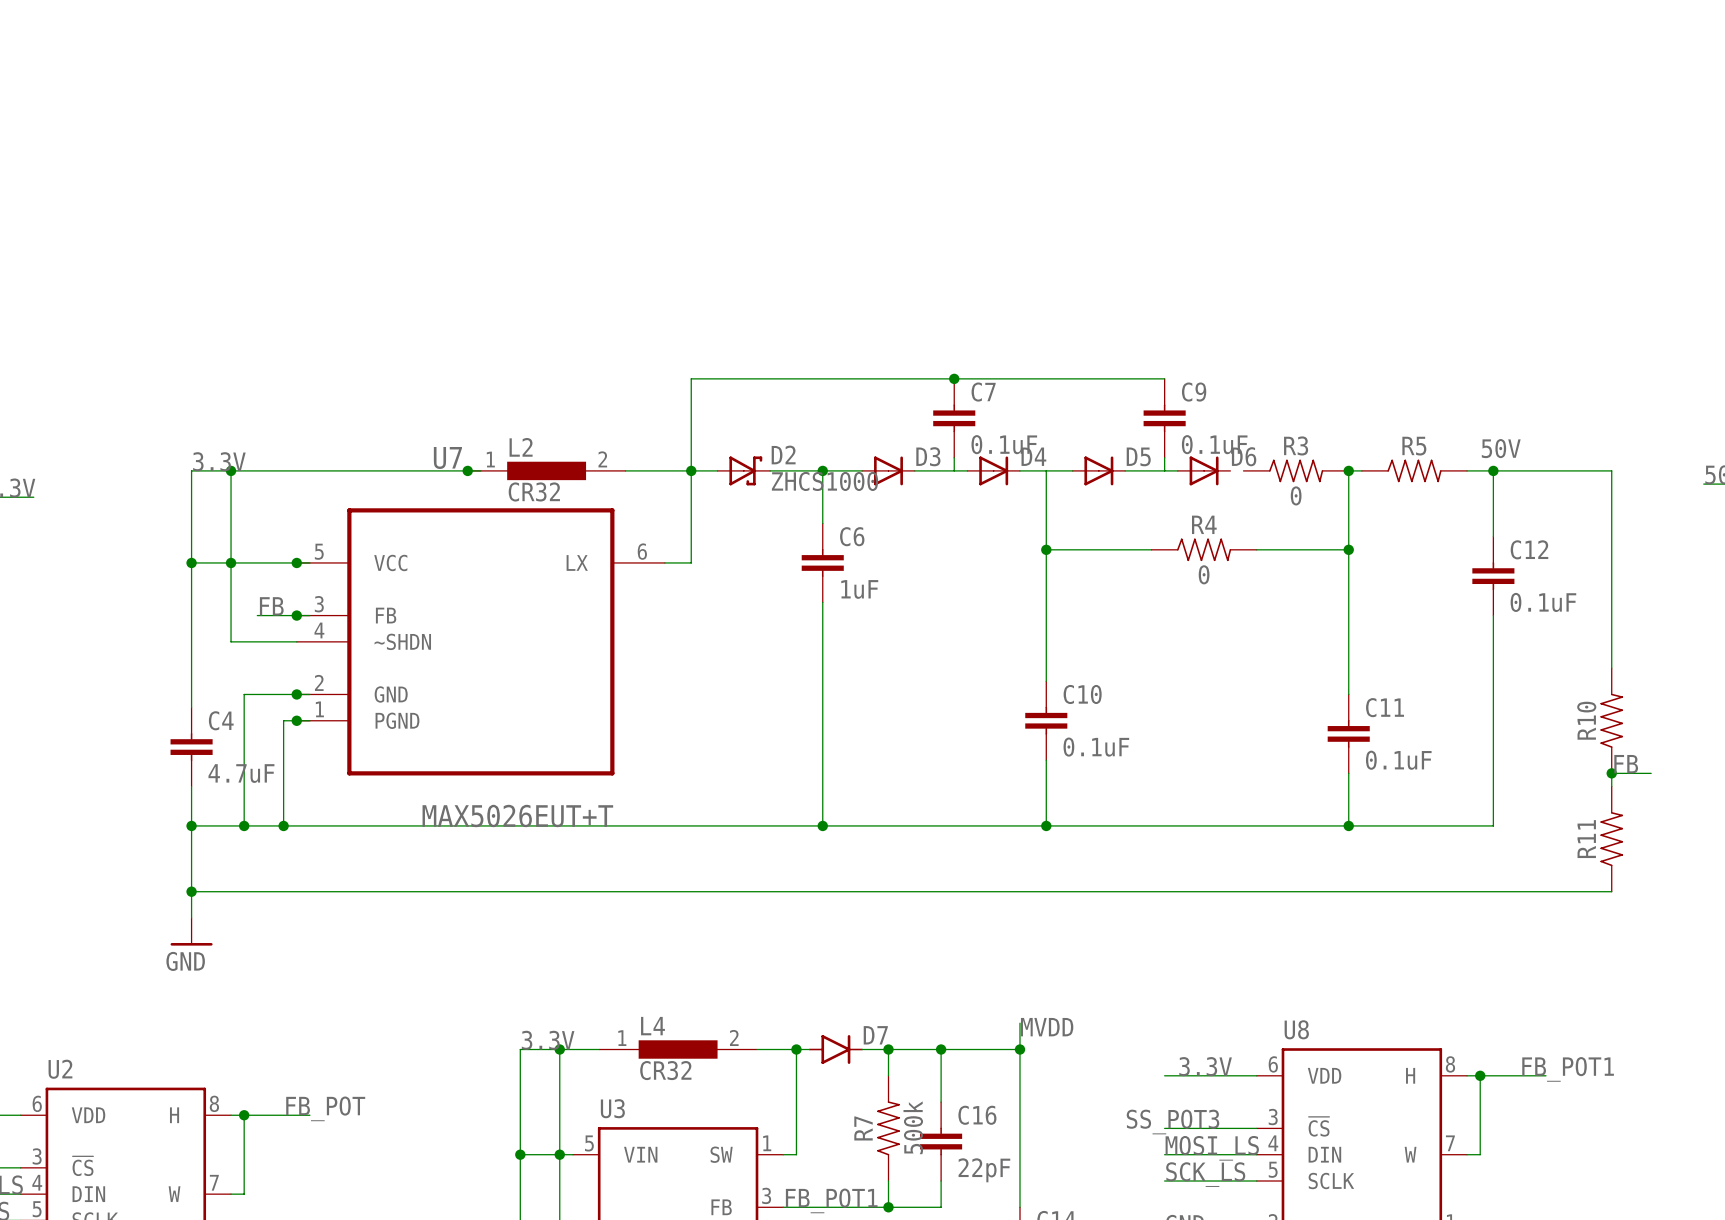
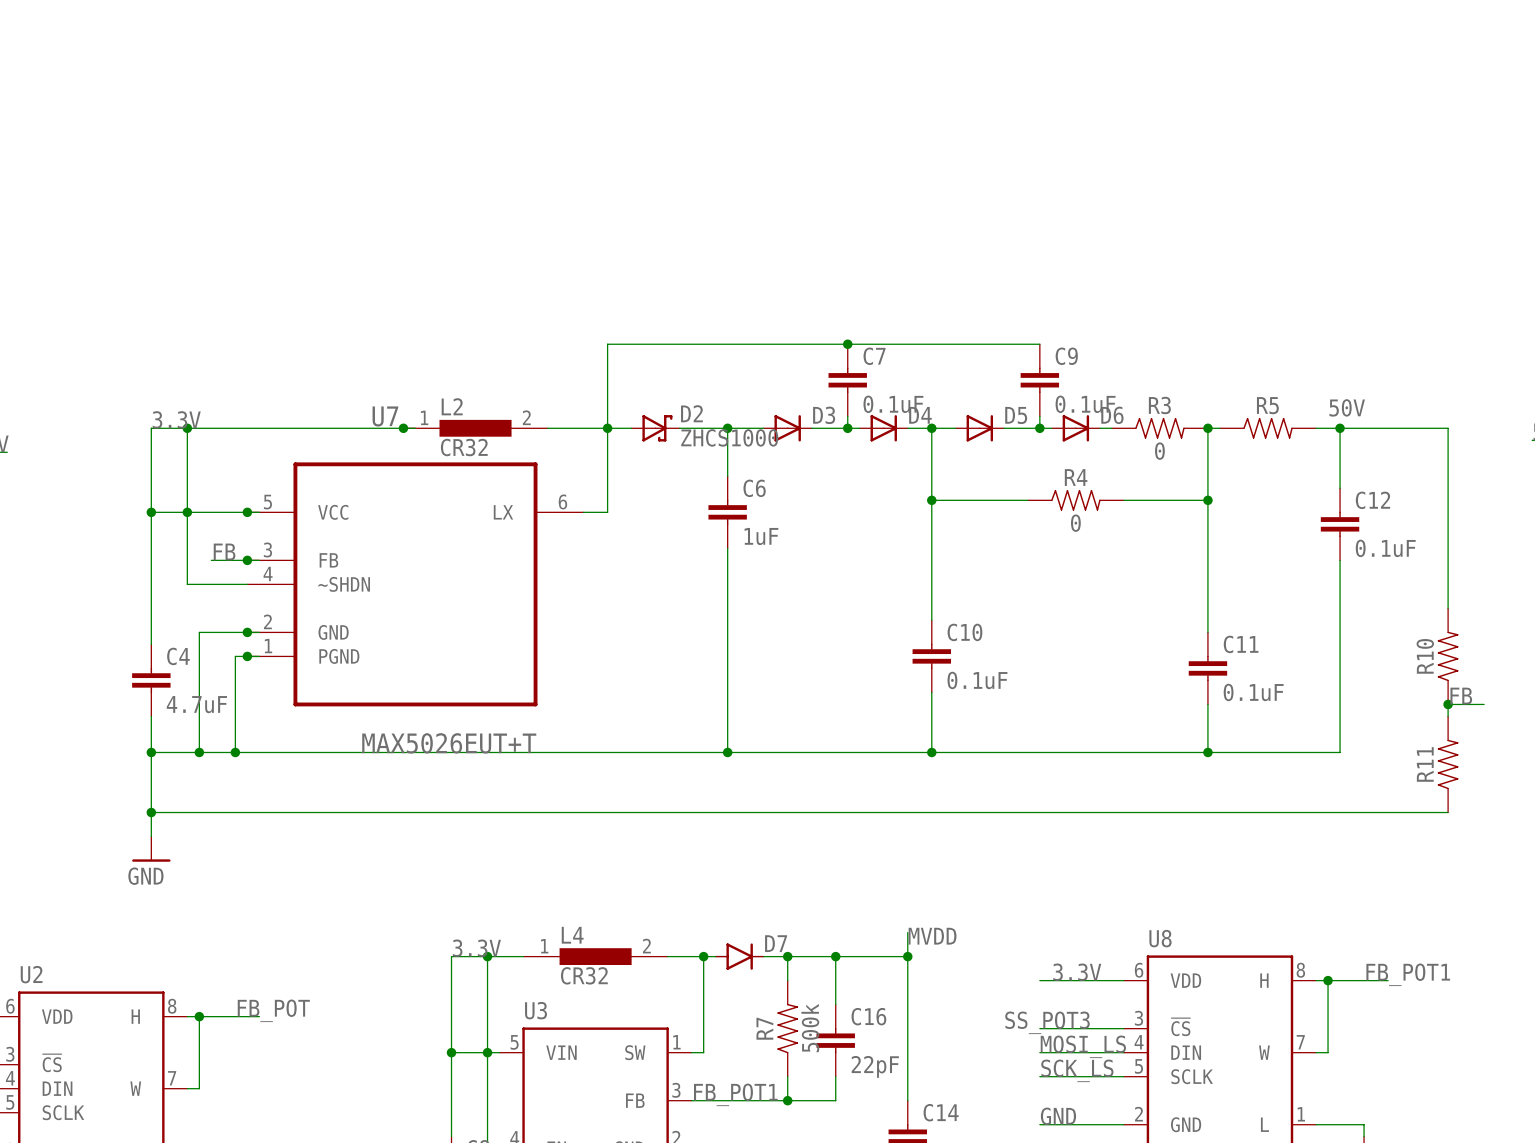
junction: none -> (847, 428)
junction: none -> (931, 428)
junction: none -> (1039, 428)
wire: none -> (1099, 428) (1111, 428)

